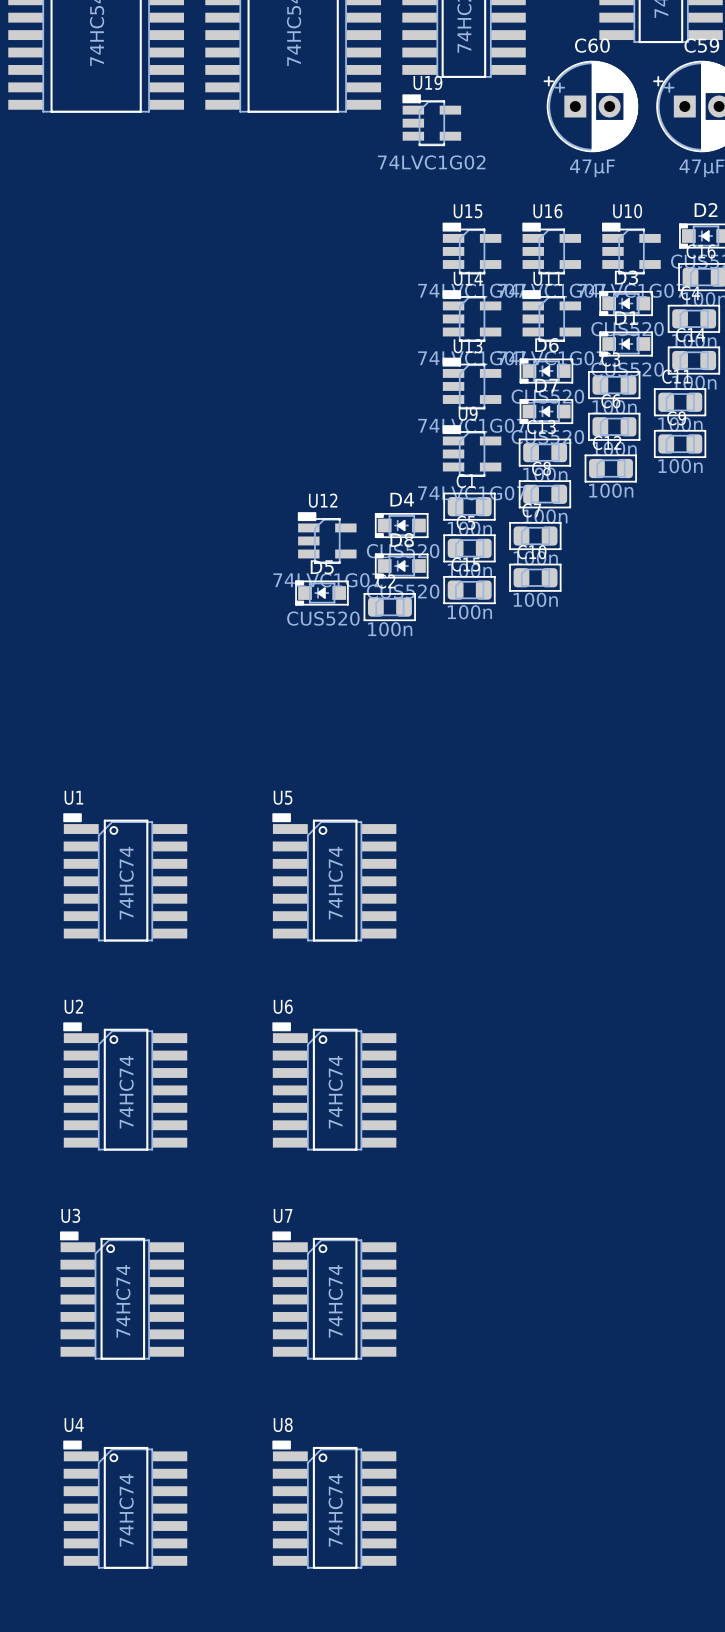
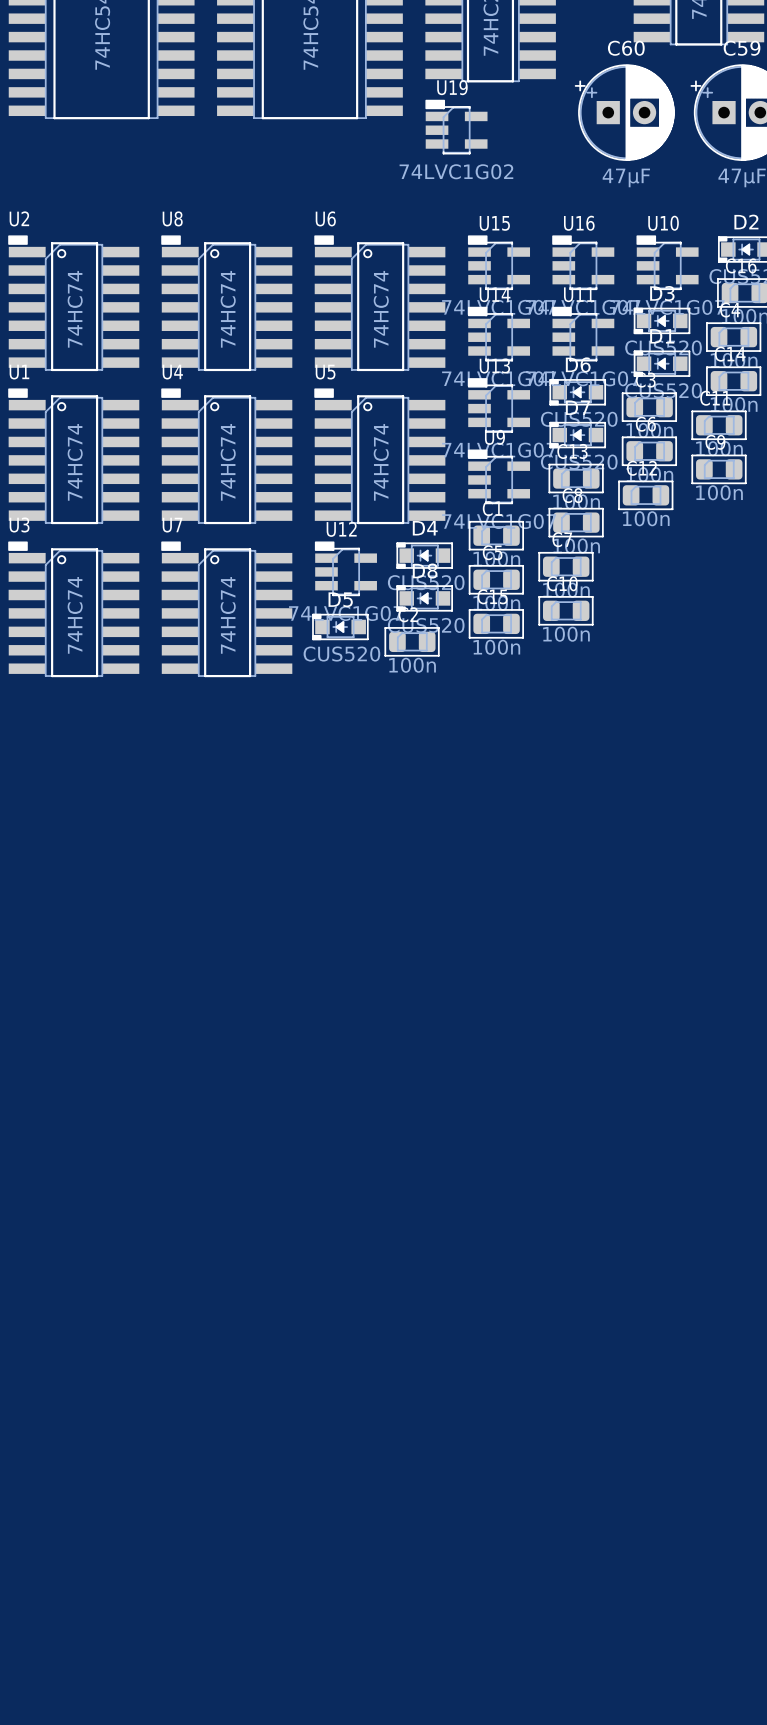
U1 position: (125, 877) -> (73, 456)
U5 position: (334, 877) -> (379, 456)
U2 position: (125, 1086) -> (73, 303)
U6 position: (334, 1086) -> (379, 303)
U3 position: (122, 1295) -> (73, 609)
U7 position: (334, 1295) -> (226, 609)
U4 position: (125, 1504) -> (226, 456)
U8 position: (334, 1504) -> (226, 303)

